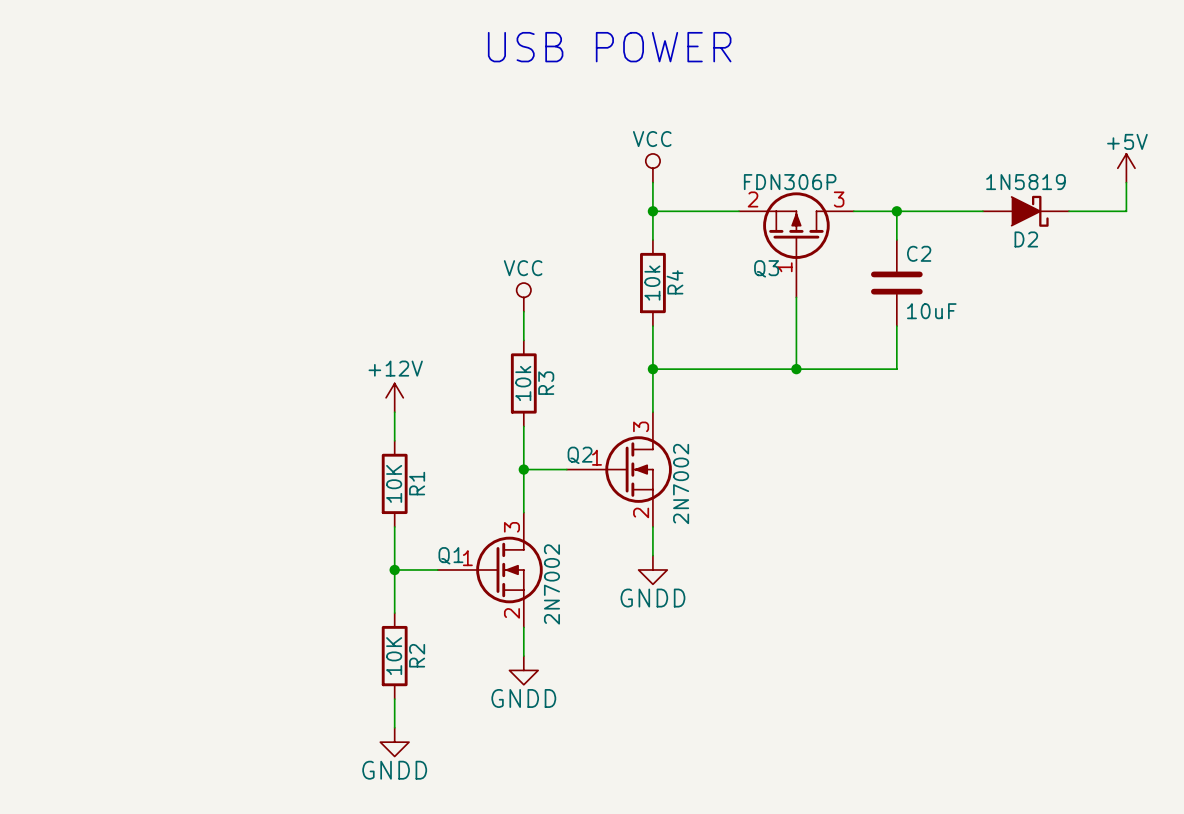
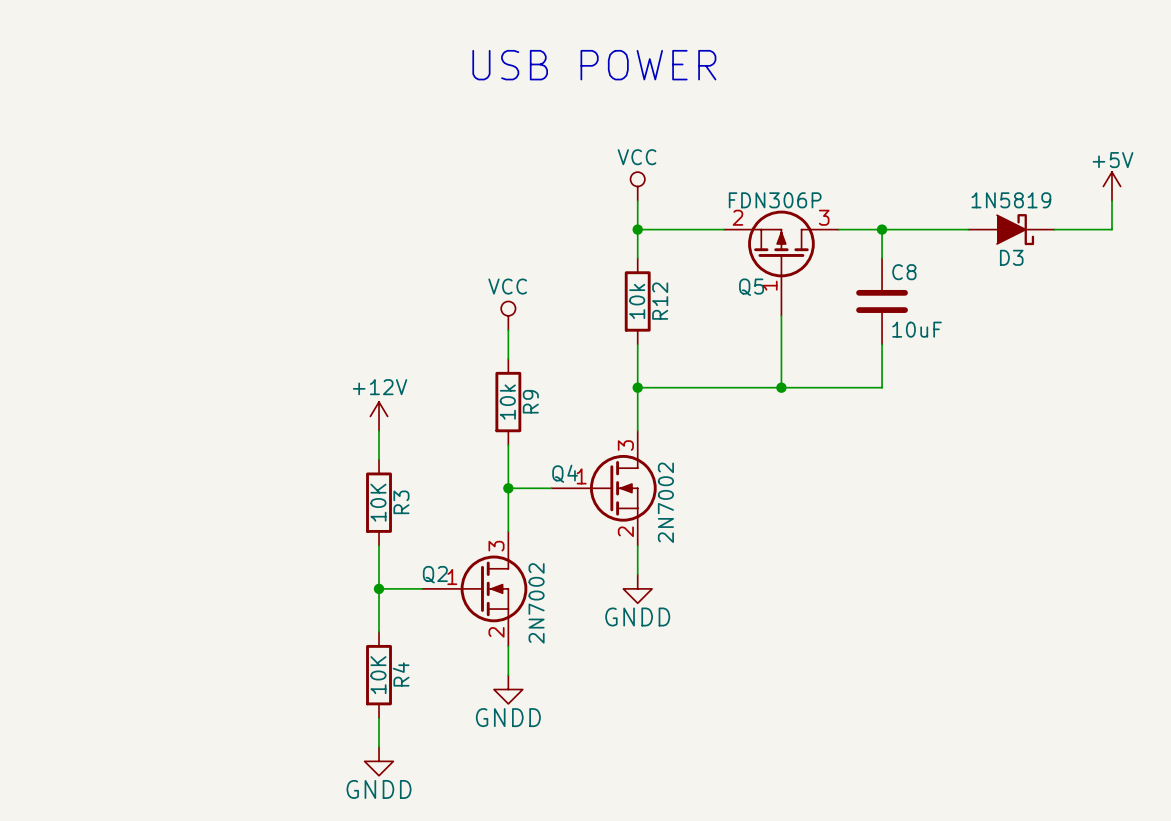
D2 name: D2 (1026, 239) -> D3 (1011, 257)
C2 name: C2 (919, 253) -> C8 (904, 272)
Q3 name: Q3 (766, 268) -> Q5 (751, 287)
R4 name: R4 (675, 282) -> R12 (660, 301)
R3 name: R3 (546, 383) -> R9 (530, 401)
Q2 name: Q2 (580, 455) -> Q4 (565, 473)
R1 name: R1 (417, 483) -> R3 (401, 502)
Q1 name: Q1 (450, 555) -> Q2 (435, 574)
R2 name: R2 (417, 655) -> R4 (401, 674)

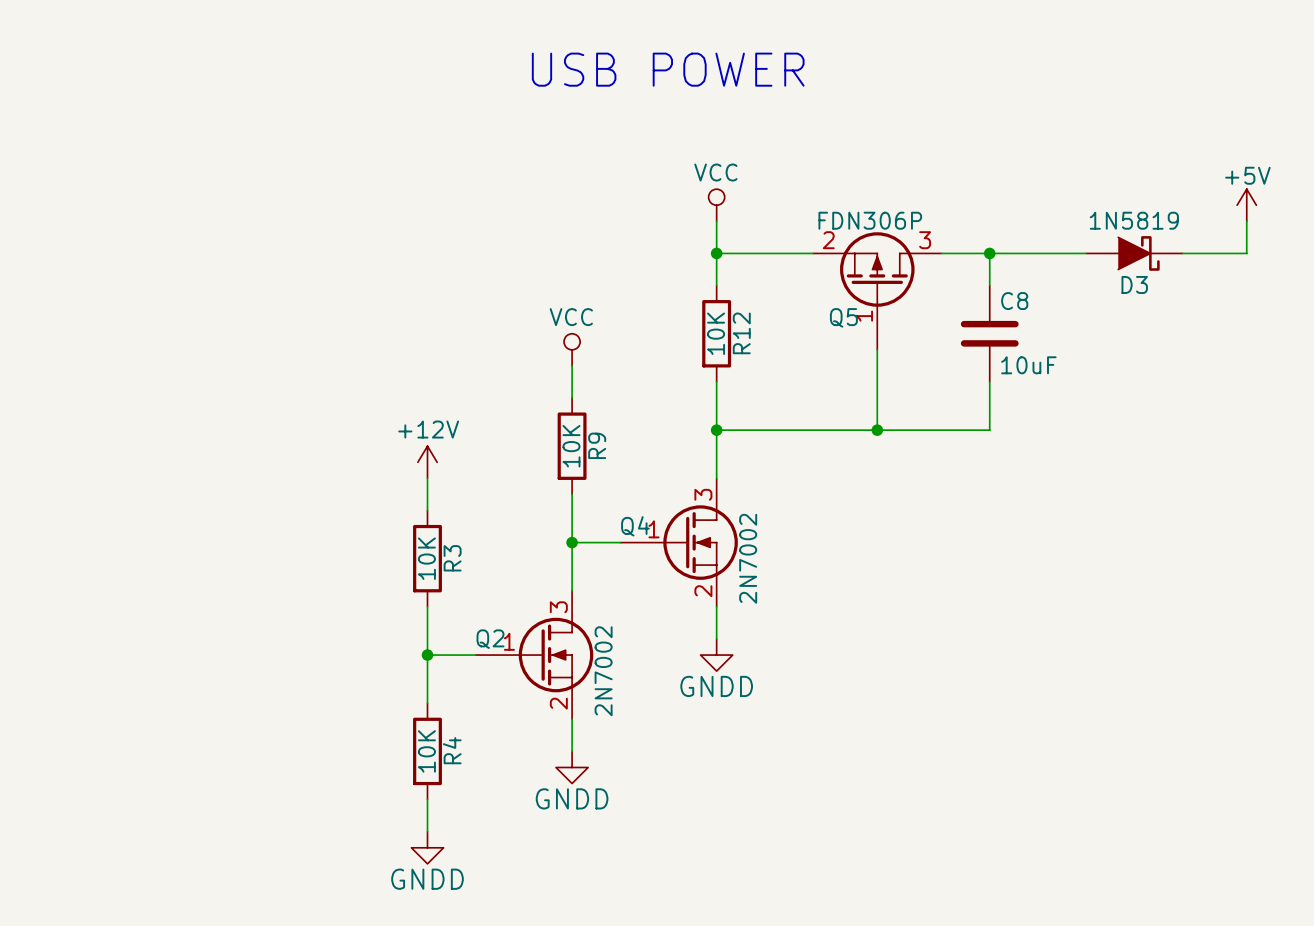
R12 value: 10k (637, 301) -> 10K (716, 333)
R9 value: 10k (507, 402) -> 10K (571, 446)

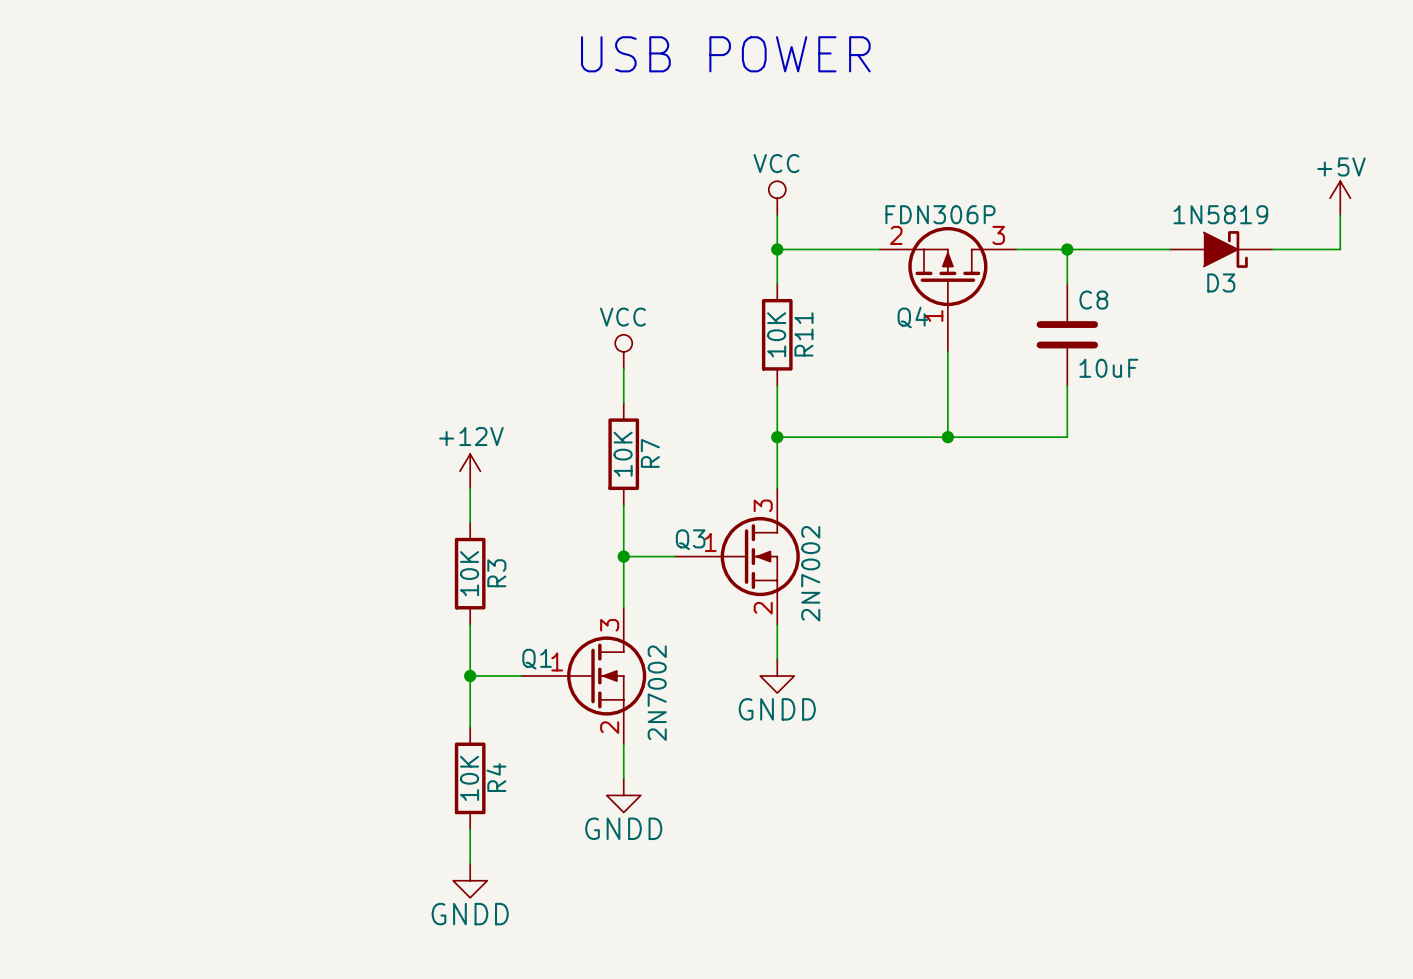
Q5 name: Q5 (843, 317) -> Q4 (912, 317)
R12 name: R12 (741, 333) -> R11 (803, 334)
R9 name: R9 (597, 445) -> R7 (650, 453)
Q4 name: Q4 (635, 526) -> Q3 (690, 539)
Q2 name: Q2 (490, 639) -> Q1 (537, 659)

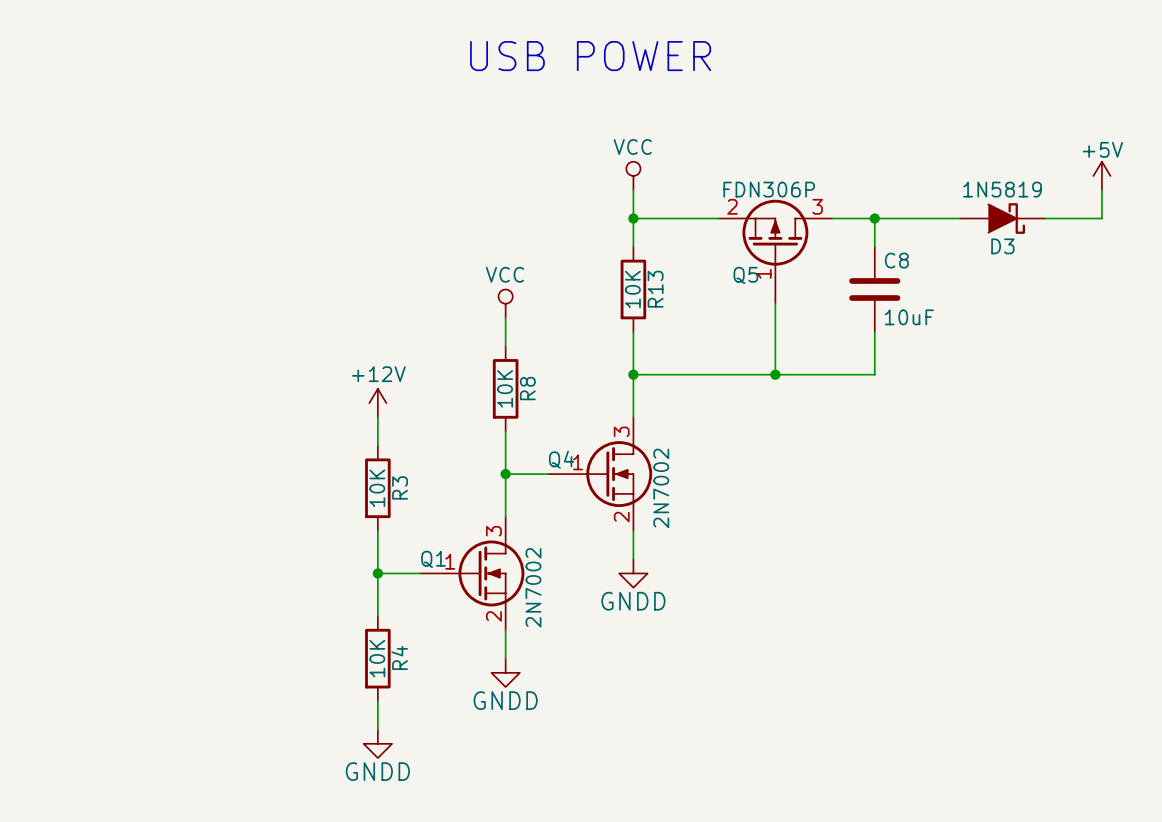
Q4 name: Q4 (912, 317) -> Q5 (745, 275)
R11 name: R11 (803, 334) -> R13 (655, 289)
R7 name: R7 (650, 453) -> R8 (527, 388)
Q3 name: Q3 (690, 539) -> Q4 (561, 459)

